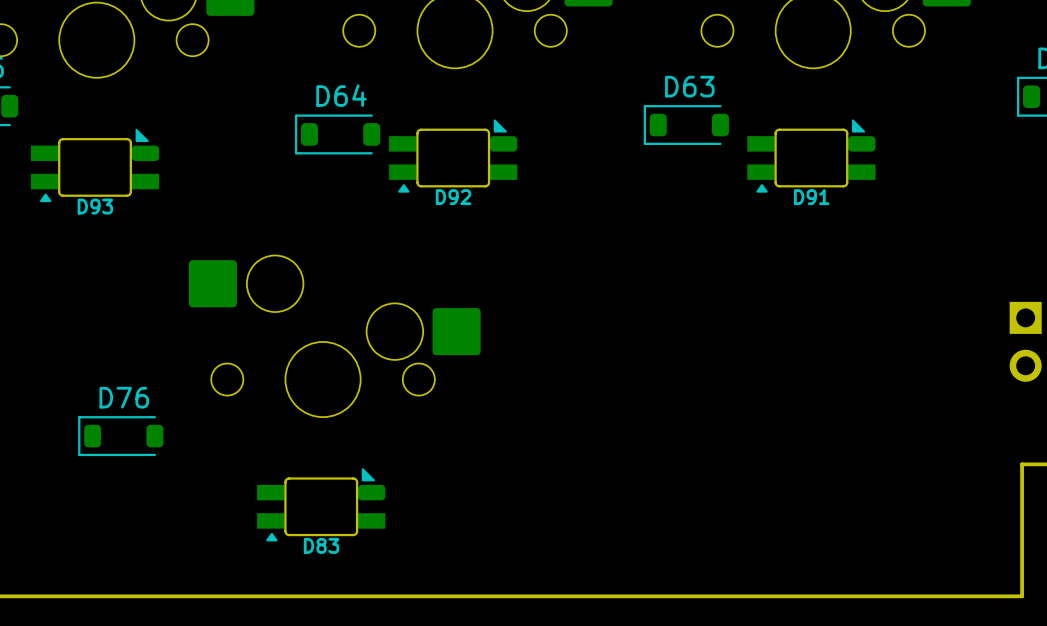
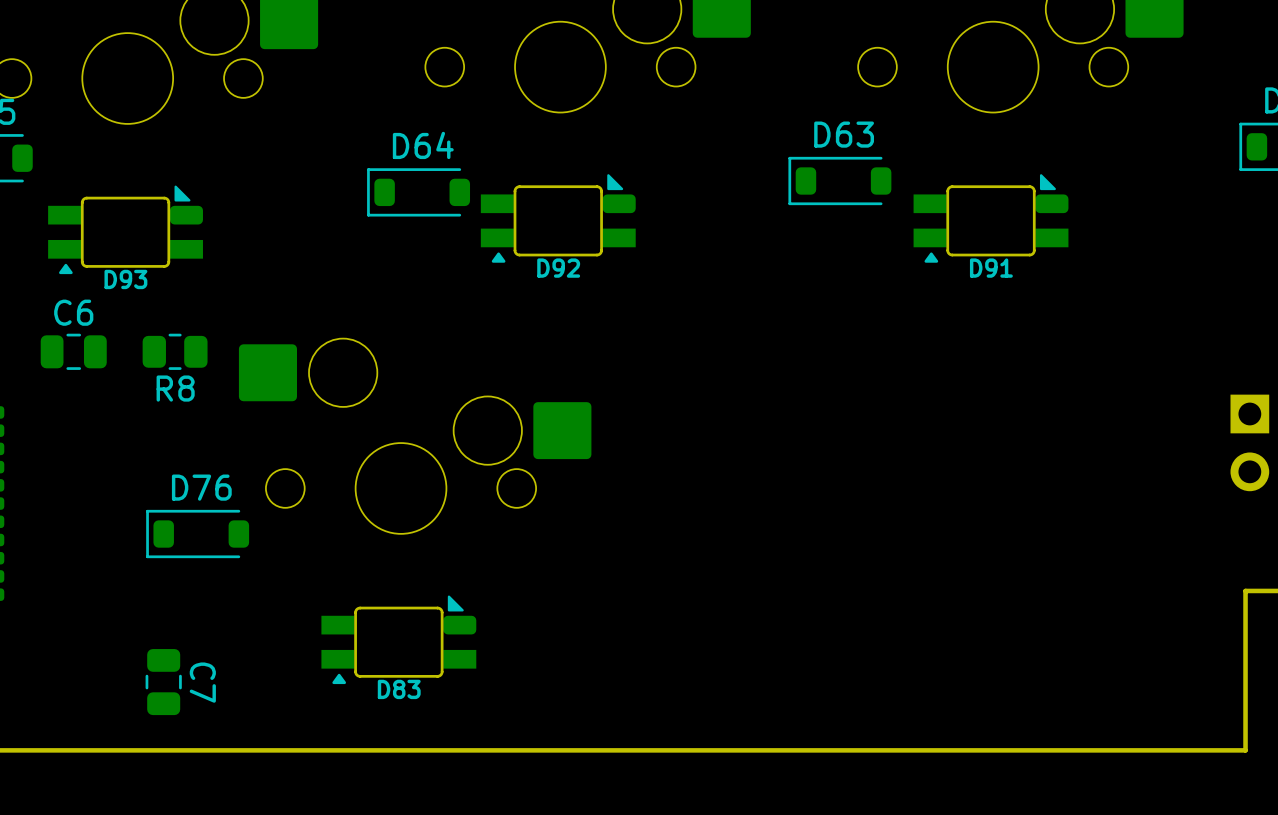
C6: none -> (73, 351)
R8: none -> (175, 351)
D76 position: (120, 436) -> (197, 534)
C7: none -> (163, 682)

